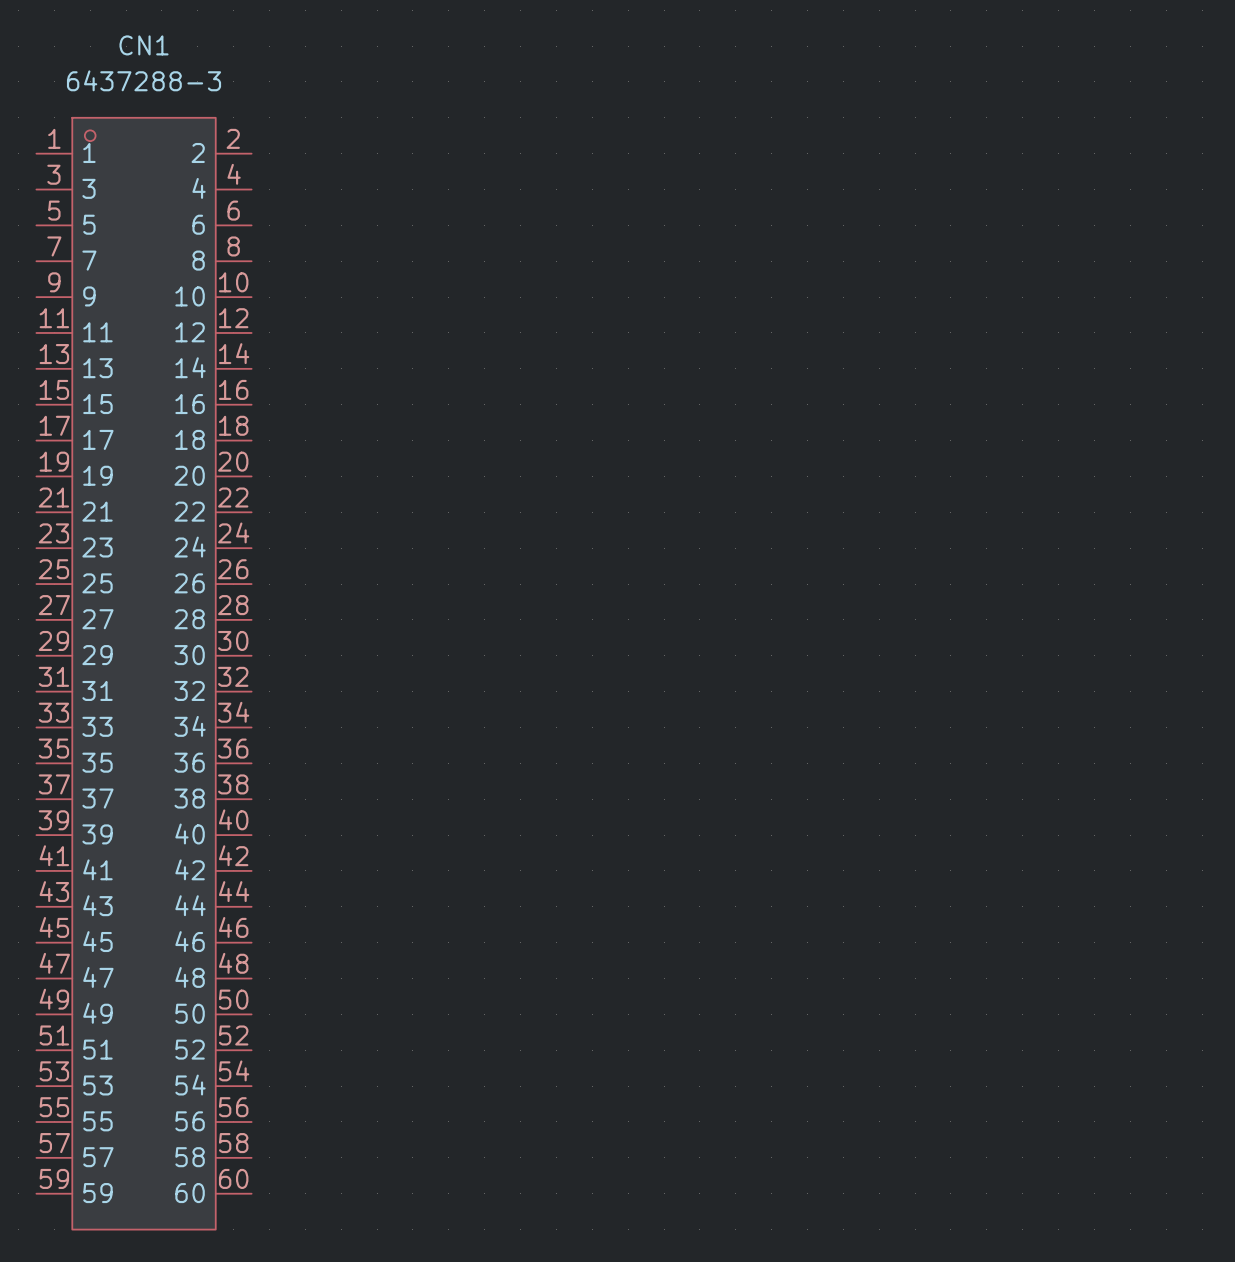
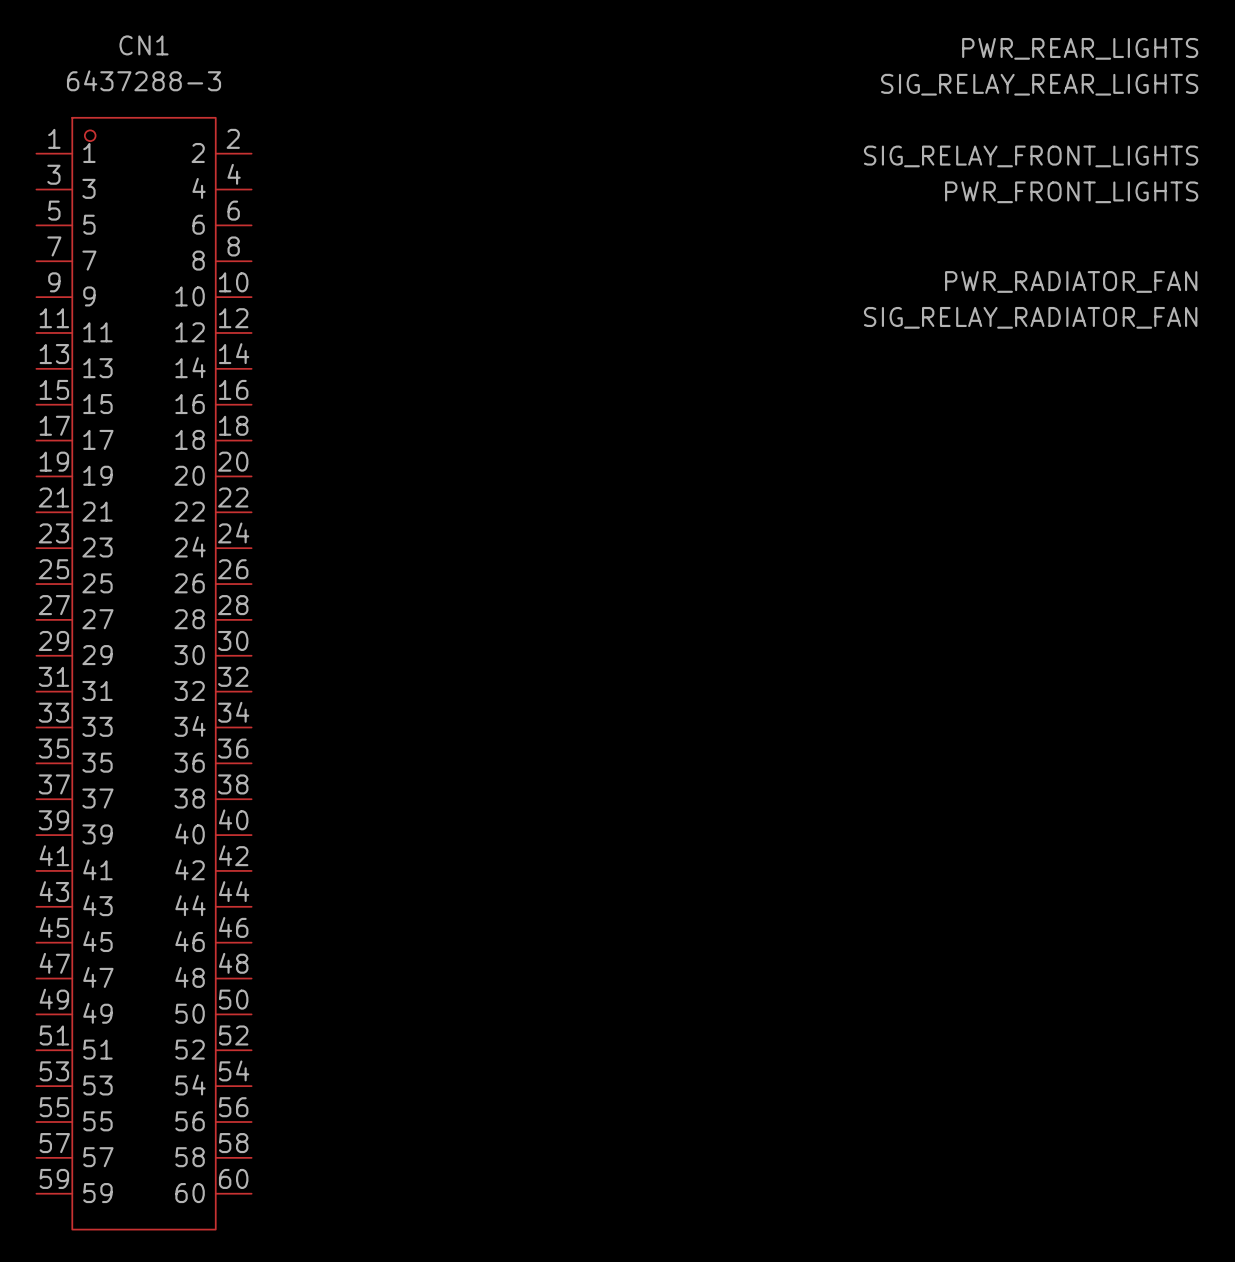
label: none -> PWR_REAR_LIGHTS (1080, 48)
label: none -> SIG_RELAY_REAR_LIGHTS (1039, 84)
label: none -> SIG_RELAY_FRONT_LIGHTS (1031, 156)
label: none -> PWR_FRONT_LIGHTS (1071, 192)
label: none -> PWR_RADIATOR_FAN (1071, 281)
label: none -> SIG_RELAY_RADIATOR_FAN (1030, 317)

